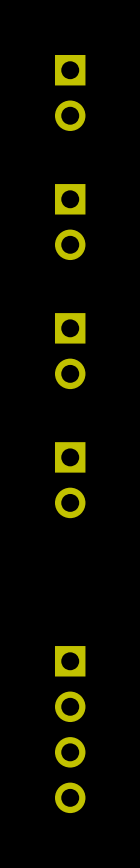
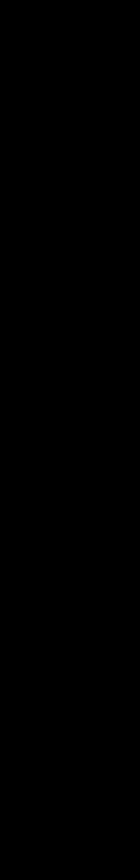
part: (70, 92) -> none
part: (70, 222) -> none
part: (70, 351) -> none
part: (70, 480) -> none
part: (70, 729) -> none

